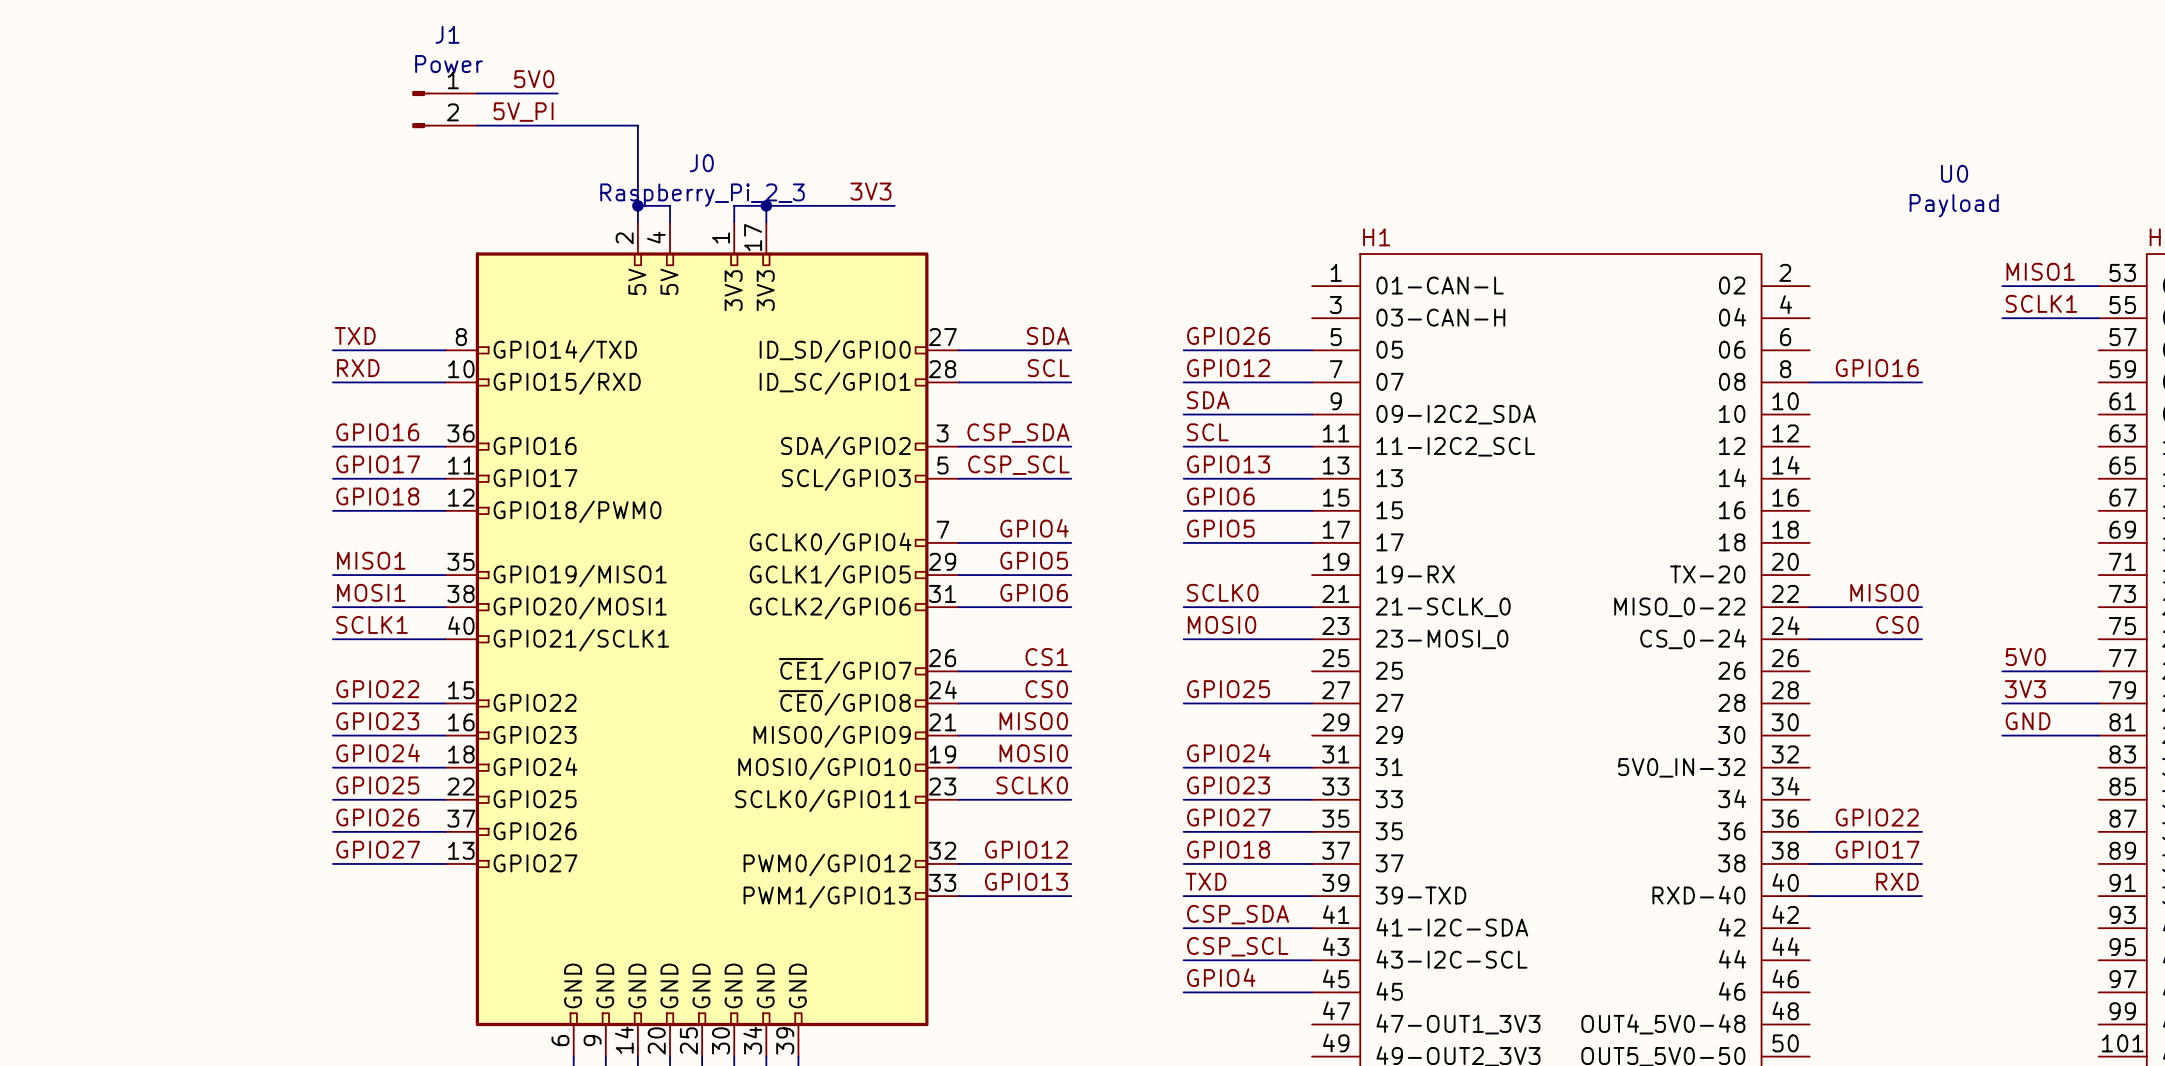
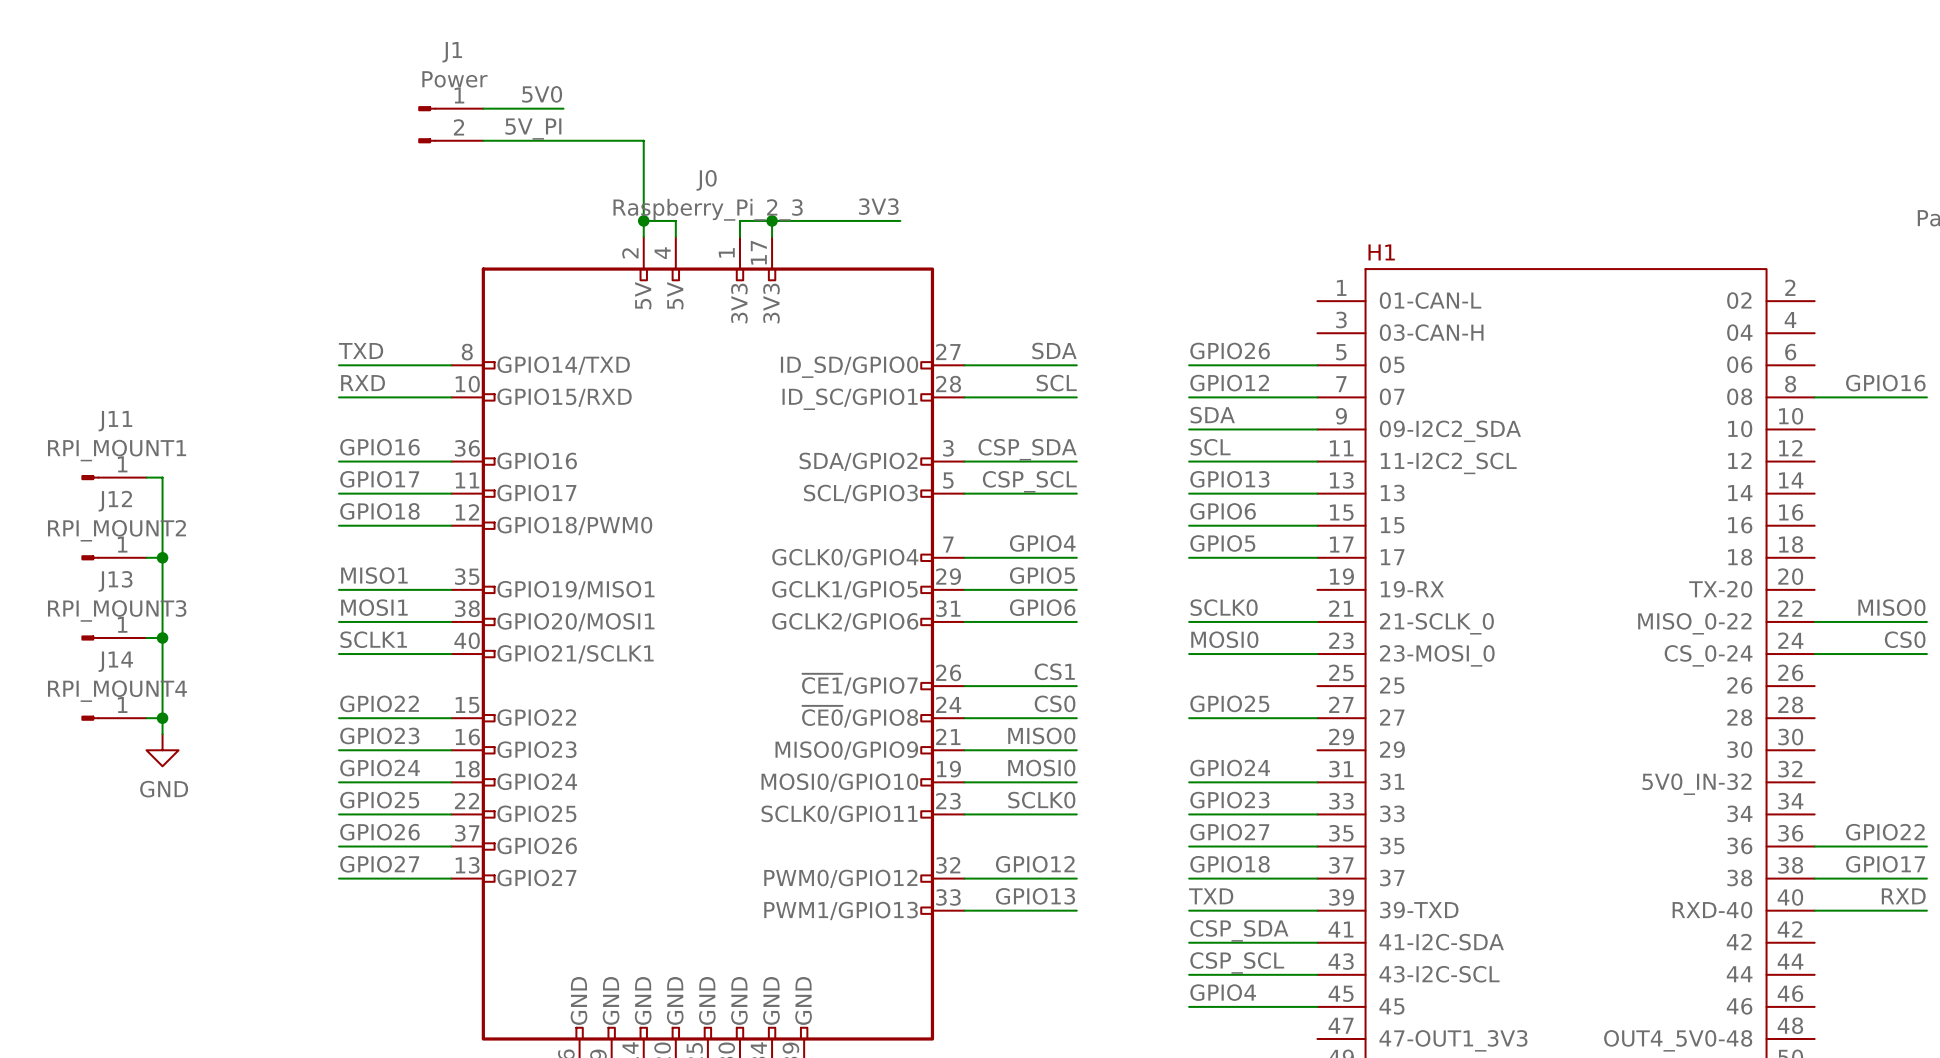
J11: none -> RPI_MOUNT1 (113, 477)
wire: none -> (146, 477) (162, 477) (162, 734)
J12: none -> RPI_MOUNT2 (113, 557)
wire: none -> (146, 557) (162, 557)
junction: none -> (162, 557)
J13: none -> RPI_MOUNT3 (113, 637)
wire: none -> (146, 637) (162, 637)
junction: none -> (162, 637)
J14: none -> RPI_MOUNT4 (113, 718)
wire: none -> (146, 718) (162, 718)
junction: none -> (162, 718)
power symbol: none -> GND (162, 750)

